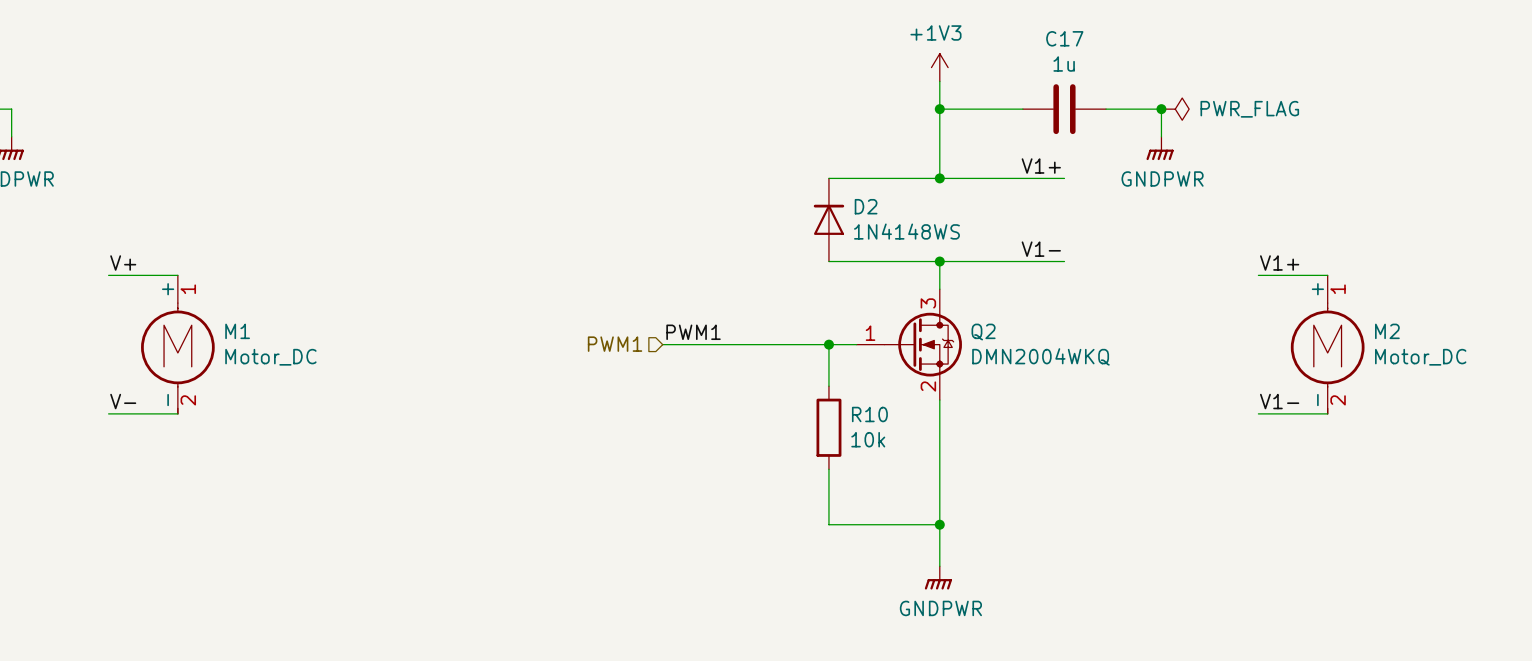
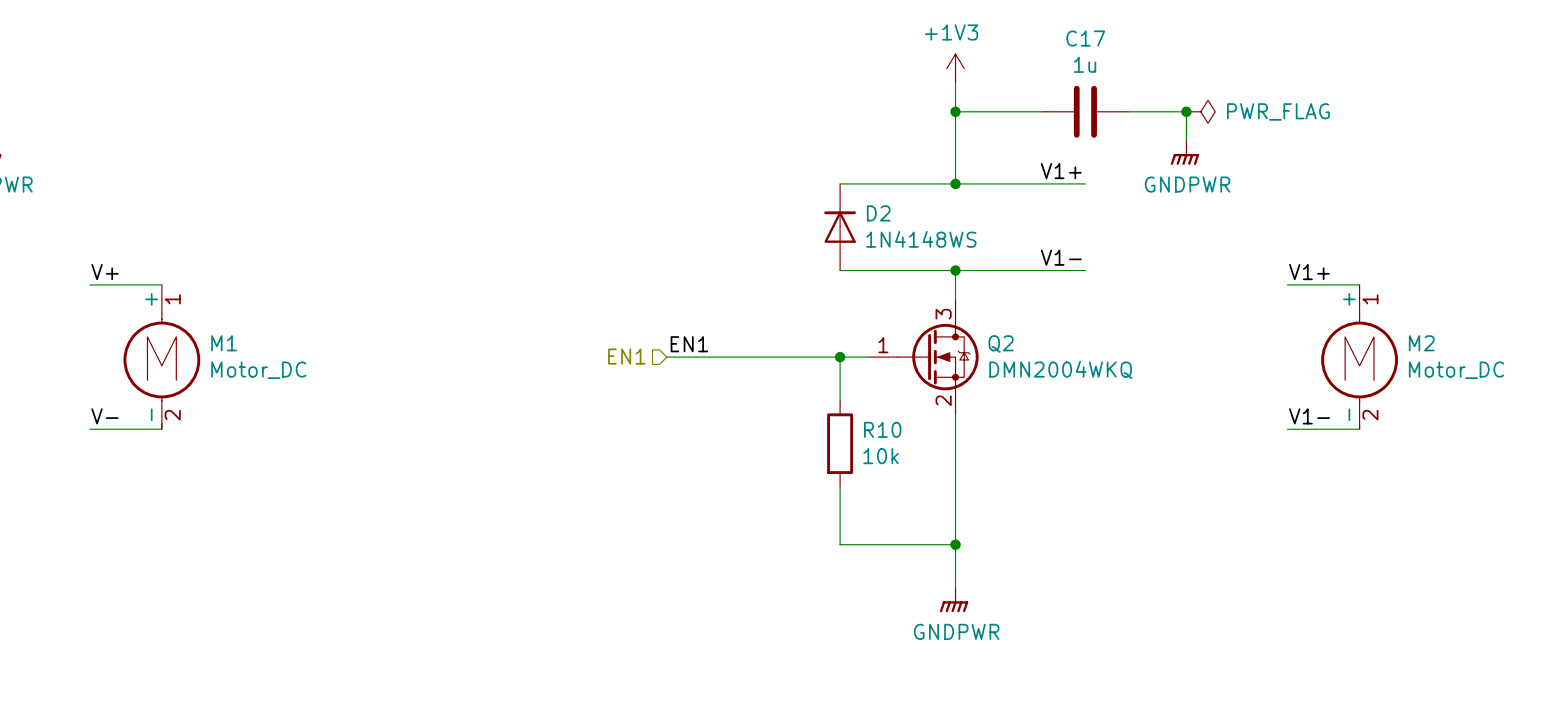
label: PWM1 (693, 332) -> EN1 (689, 344)
hierarchical label: PWM1 (615, 344) -> EN1 (626, 356)

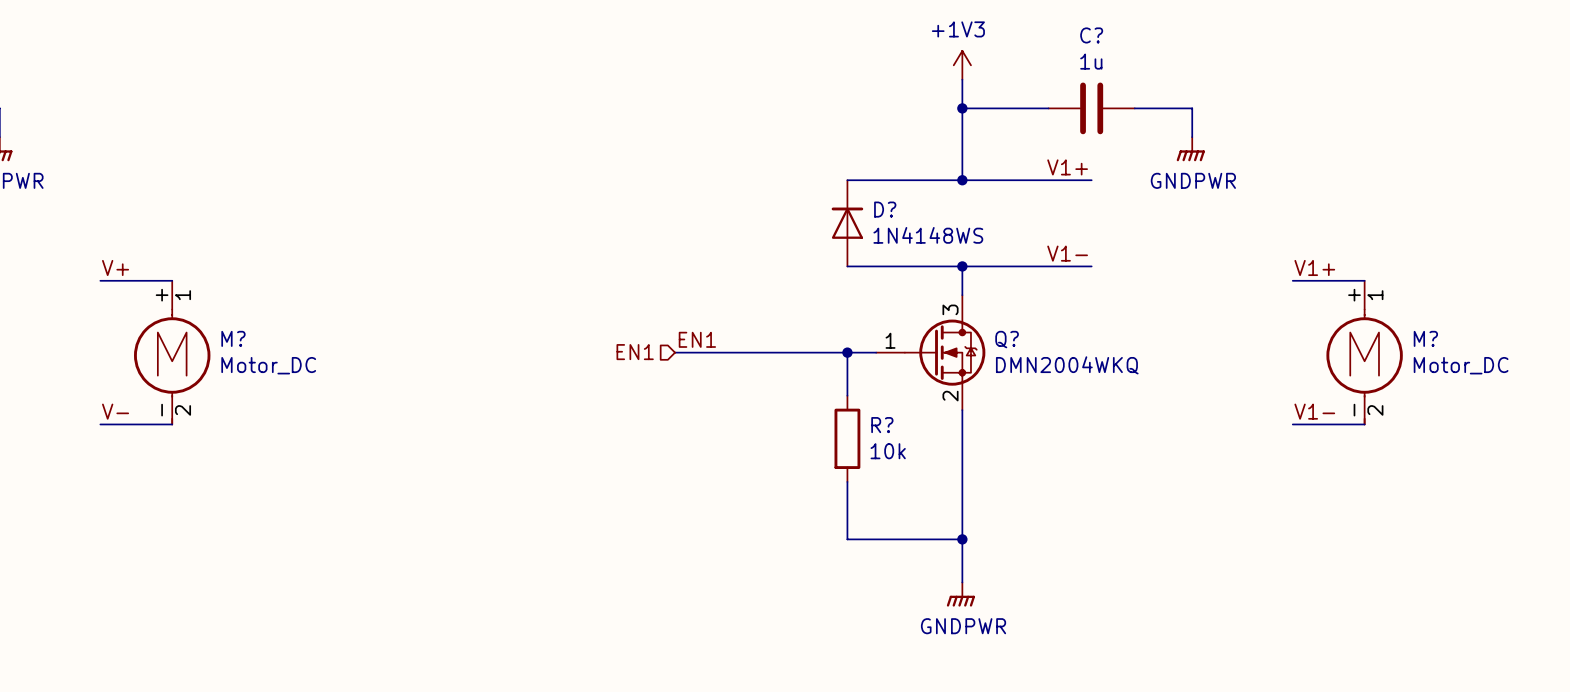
C17 name: C17 (1085, 38) -> C? (1091, 35)
junction: (1186, 111) -> none
power symbol: PWR_FLAG (1200, 111) -> none
D2 name: D2 (878, 213) -> D? (885, 209)
M1 name: M1 (224, 343) -> M? (233, 338)
Q2 name: Q2 (1001, 343) -> Q? (1007, 339)
M2 name: M2 (1421, 343) -> M? (1425, 338)
R10 name: R10 (882, 429) -> R? (882, 425)

